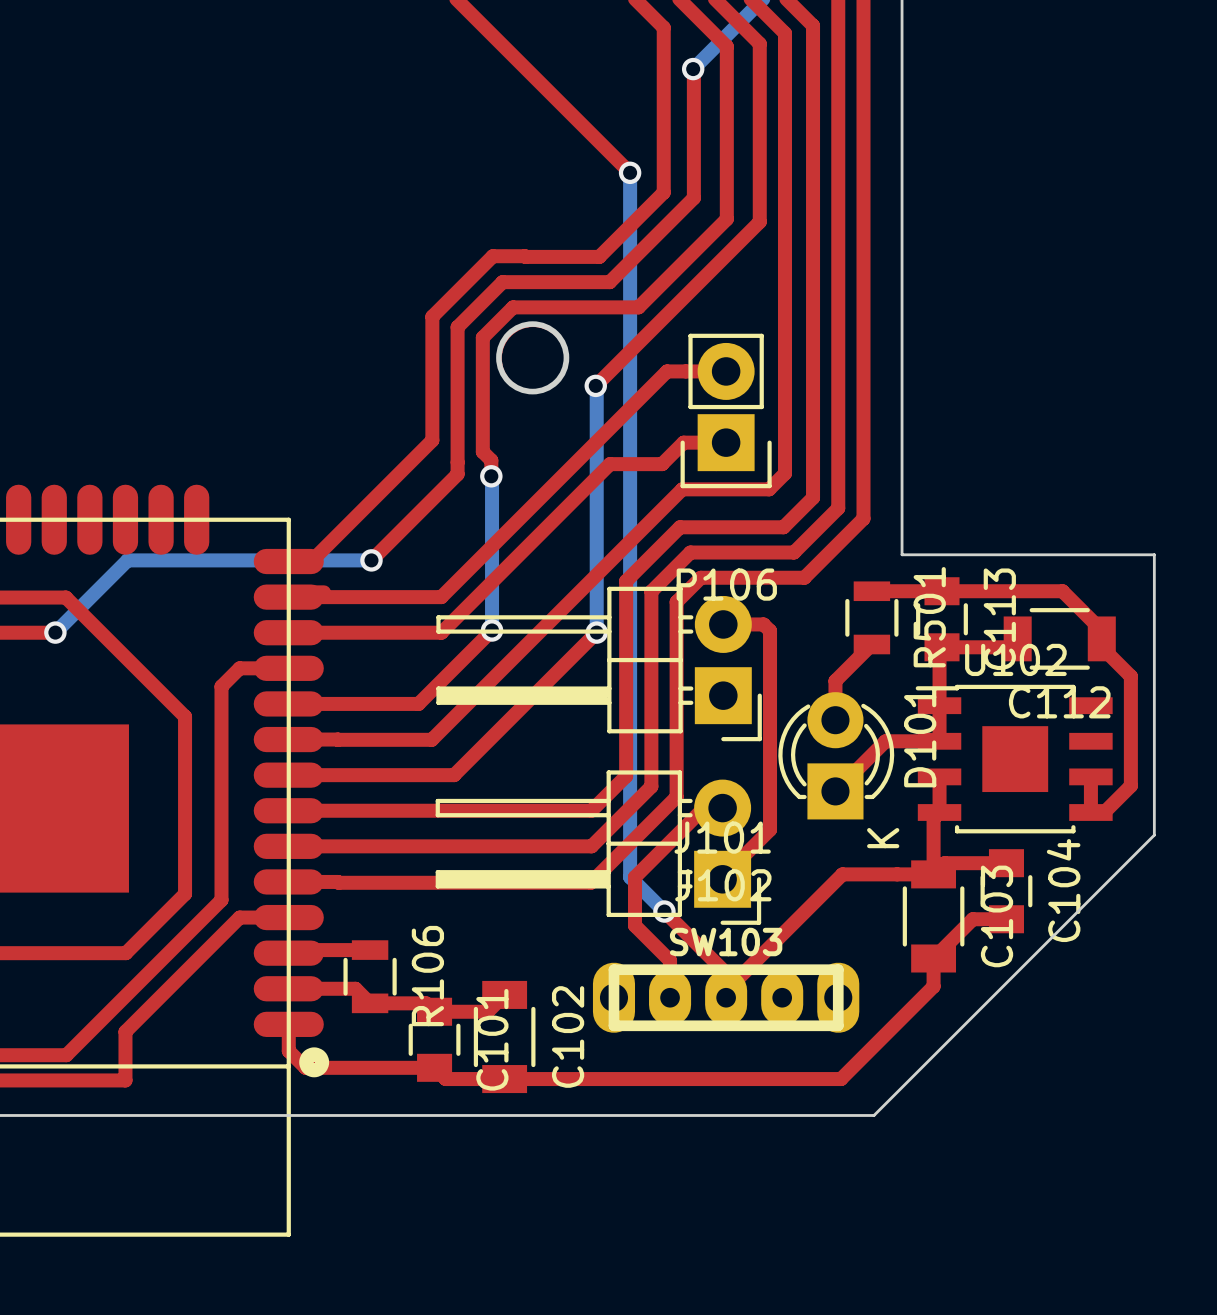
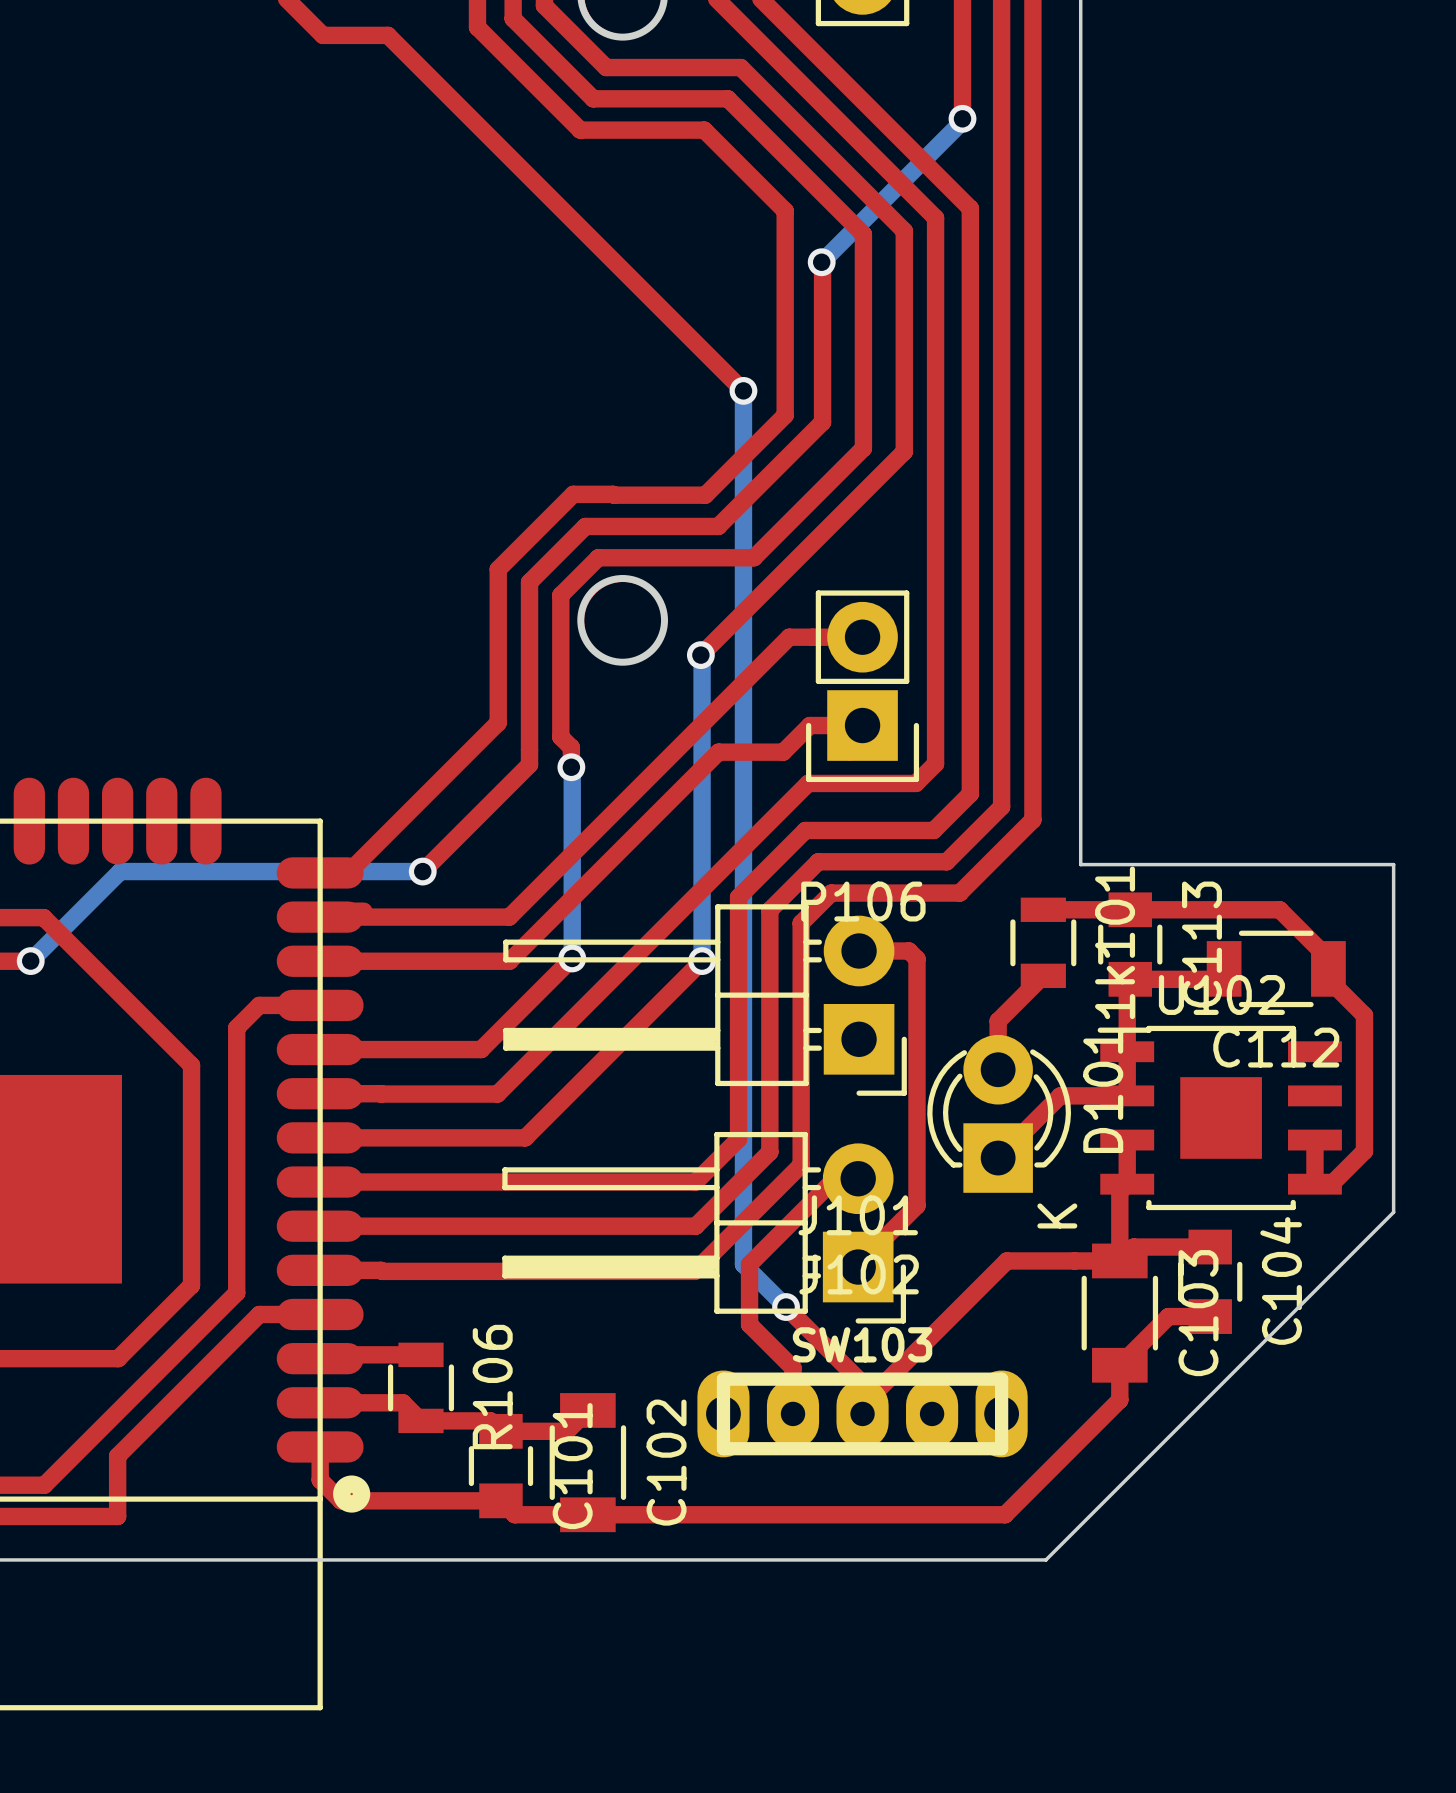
R501 name: R501 (929, 617) -> 1k101 (1115, 942)

